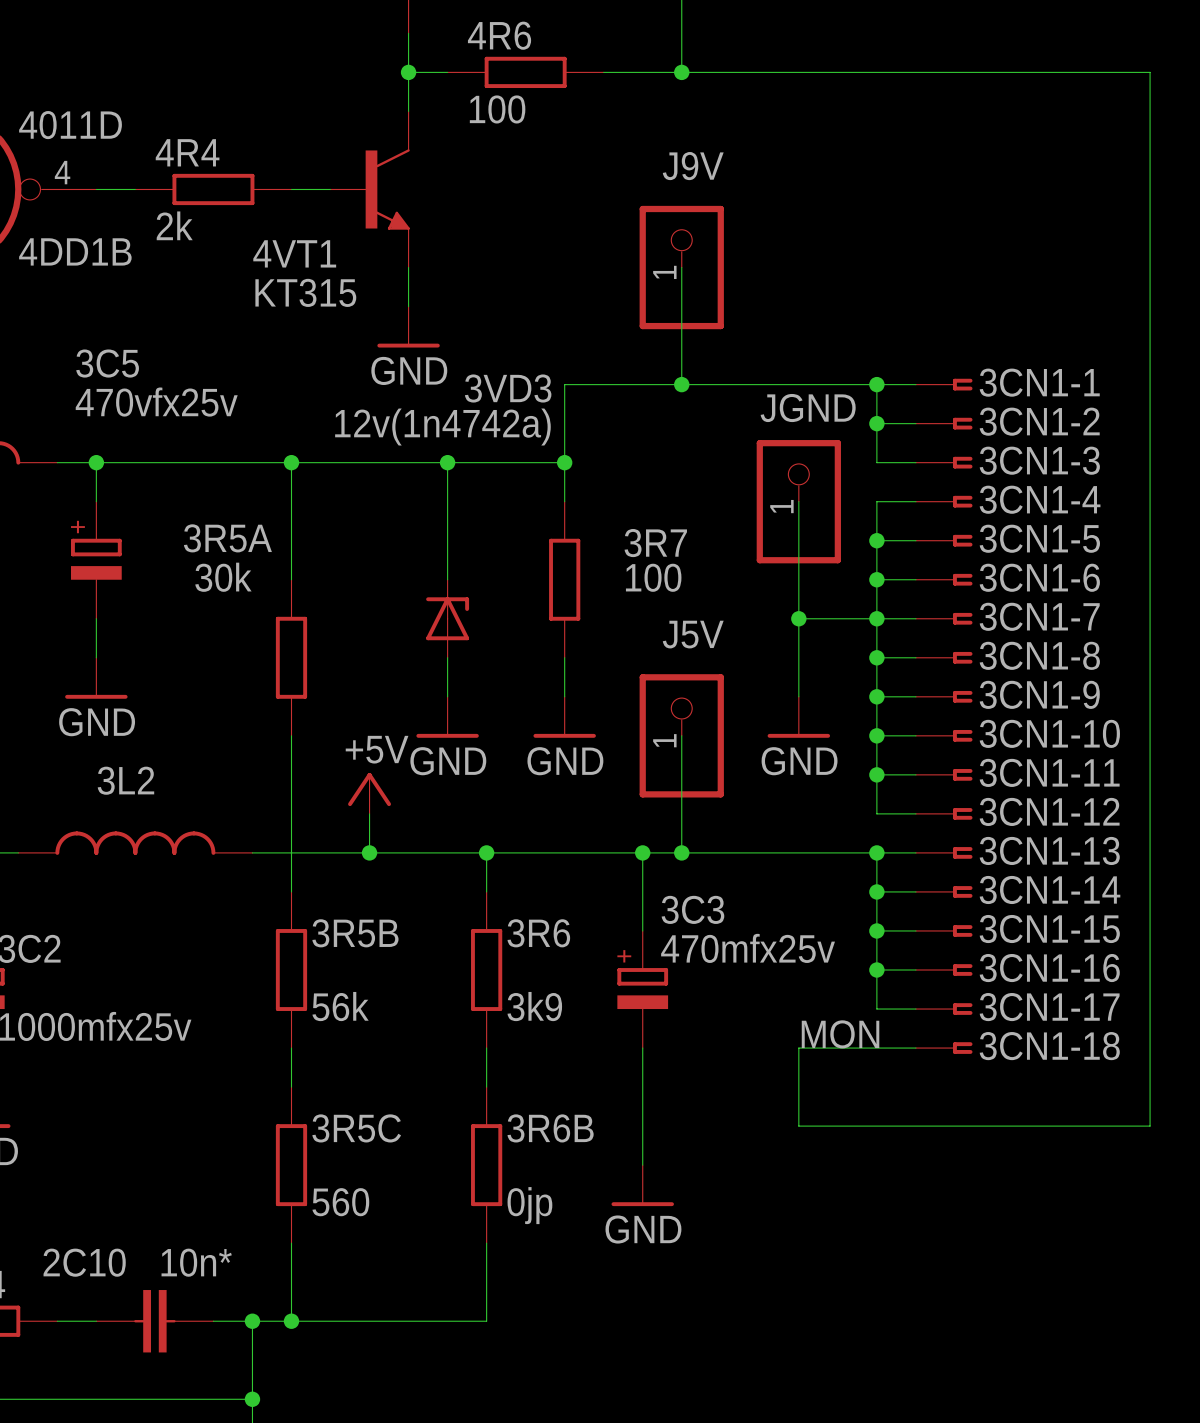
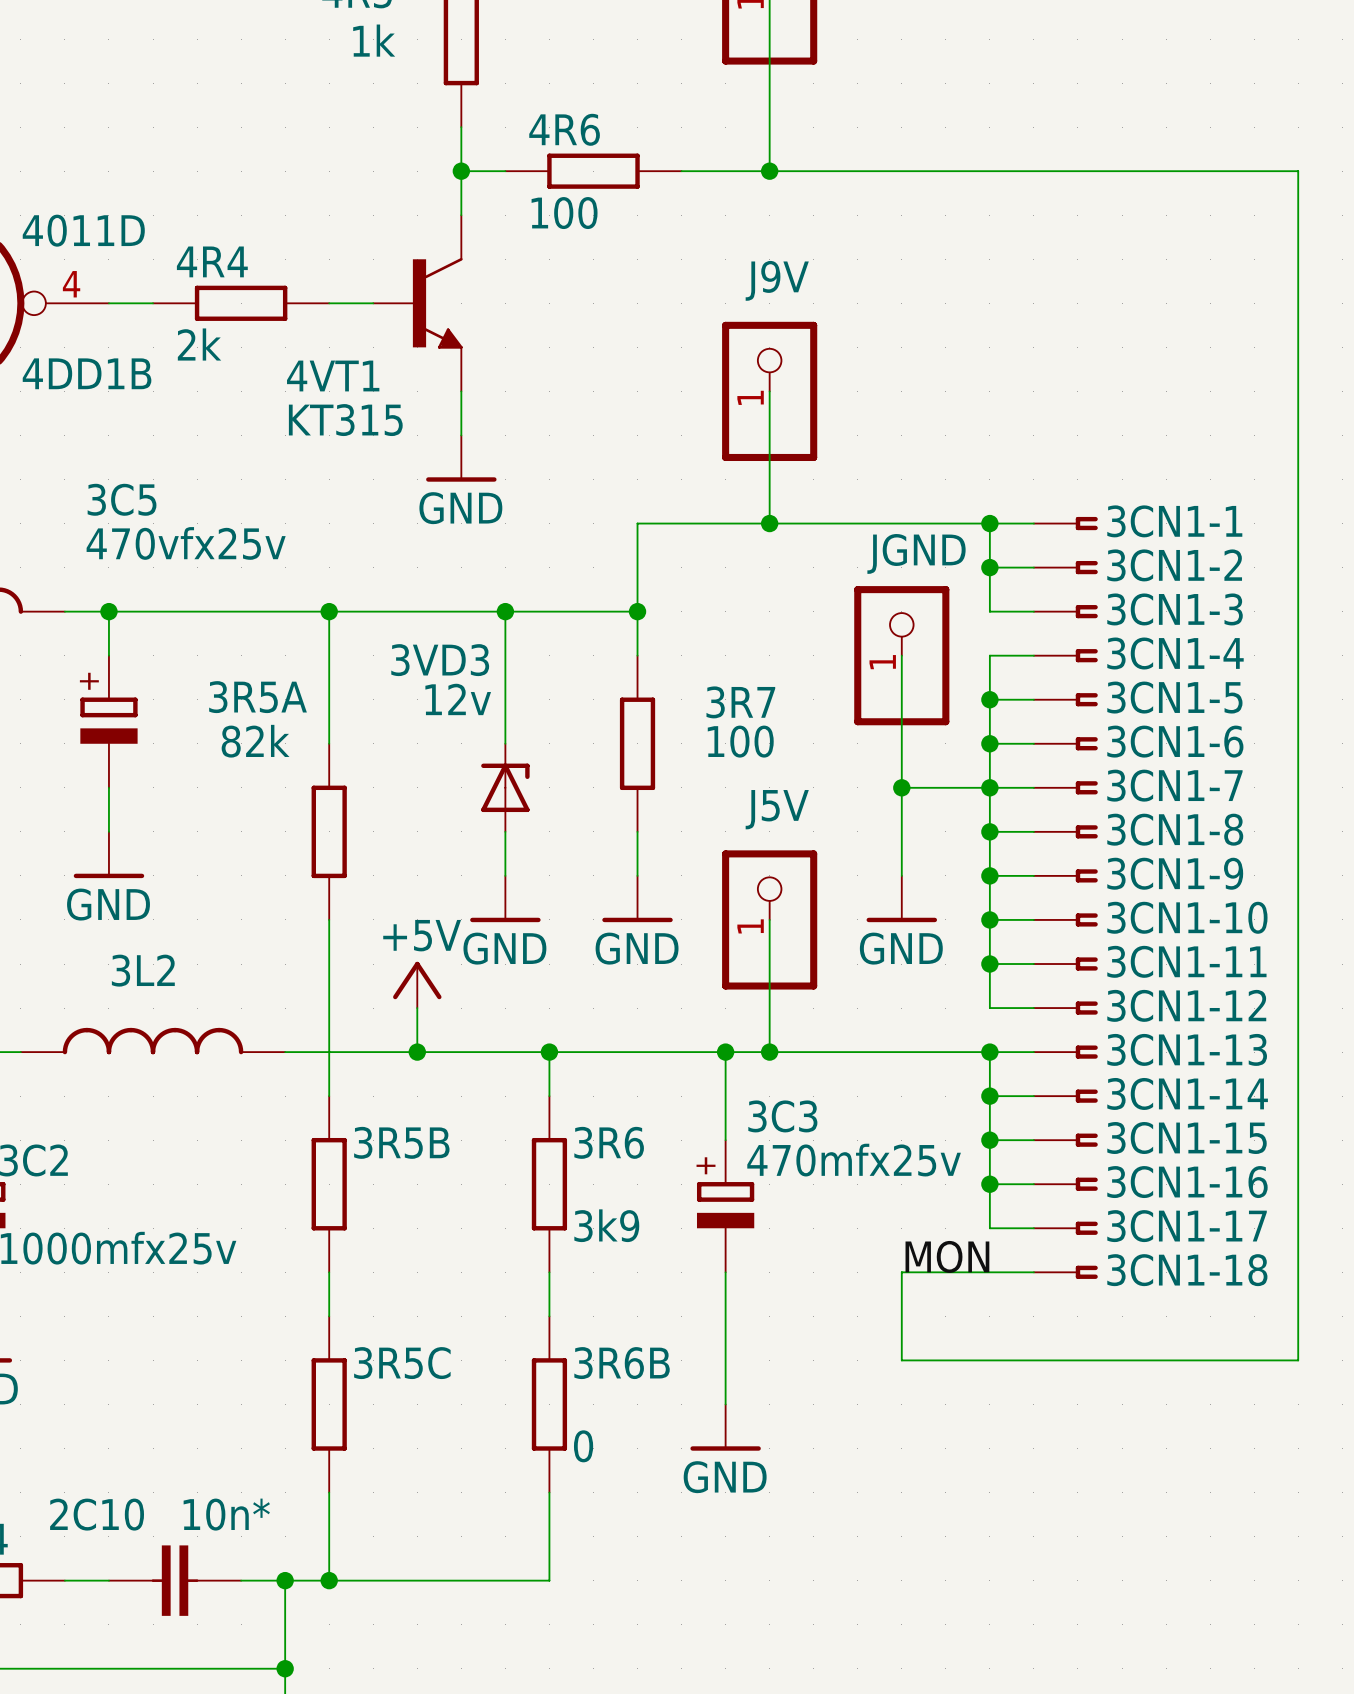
3VD3 name position: 3VD3 (508, 388) -> 3VD3 (440, 660)
3VD3 value: 12v(1n4742a) (442, 427) -> 12v (458, 699)
3R5A value: 30k (223, 577) -> 82k (255, 741)
3R5B value: 56k (340, 1006) -> none
3R5C value: 560 (340, 1202) -> none
3R6B value: 0jp (529, 1205) -> 0 (583, 1446)

